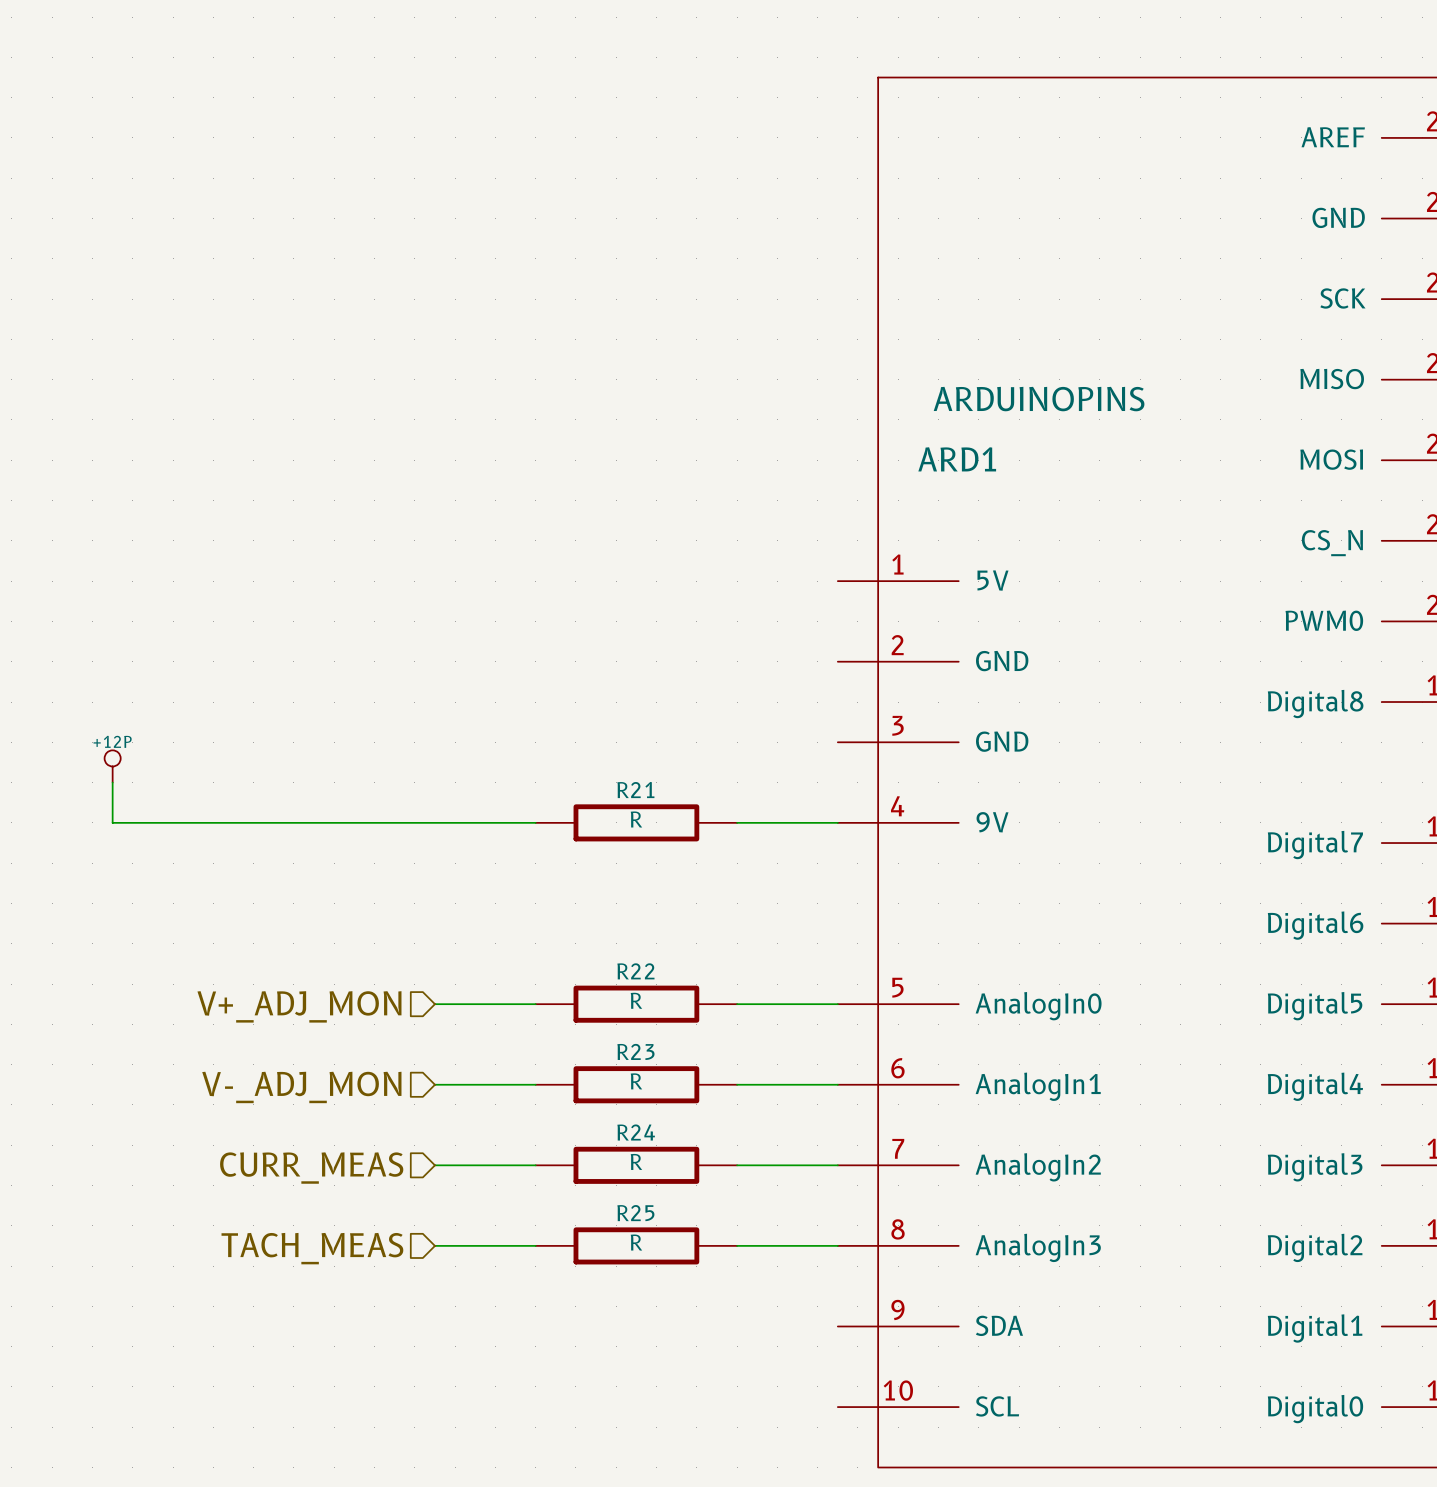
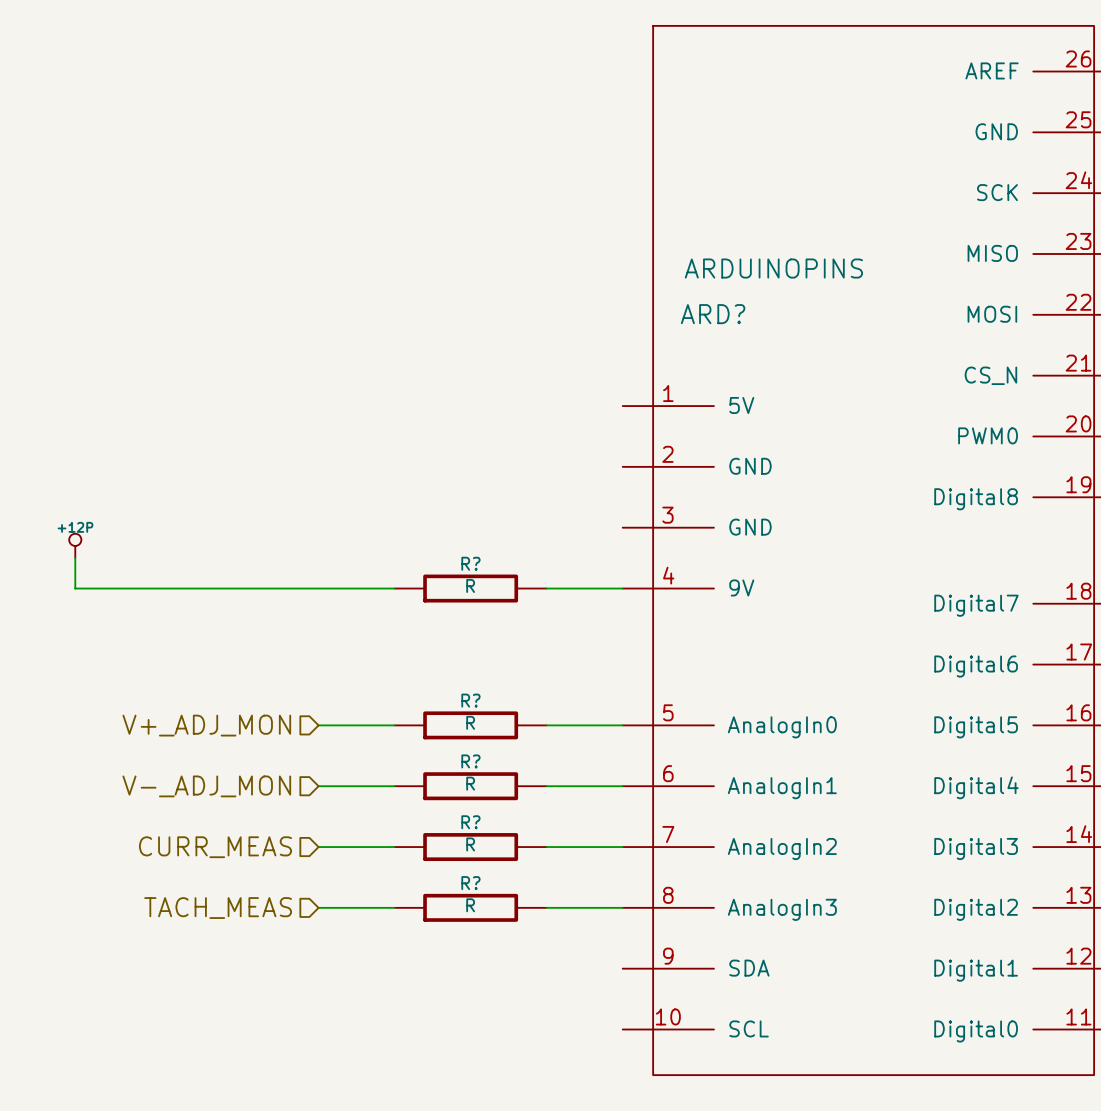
ARD1 name: ARD1 (957, 459) -> ARD? (713, 314)
R21 name: R21 (635, 790) -> R? (470, 563)
R22 name: R22 (635, 971) -> R? (470, 700)
R23 name: R23 (635, 1051) -> R? (470, 761)
R24 name: R24 (636, 1132) -> R? (470, 822)
R25 name: R25 (635, 1213) -> R? (470, 883)

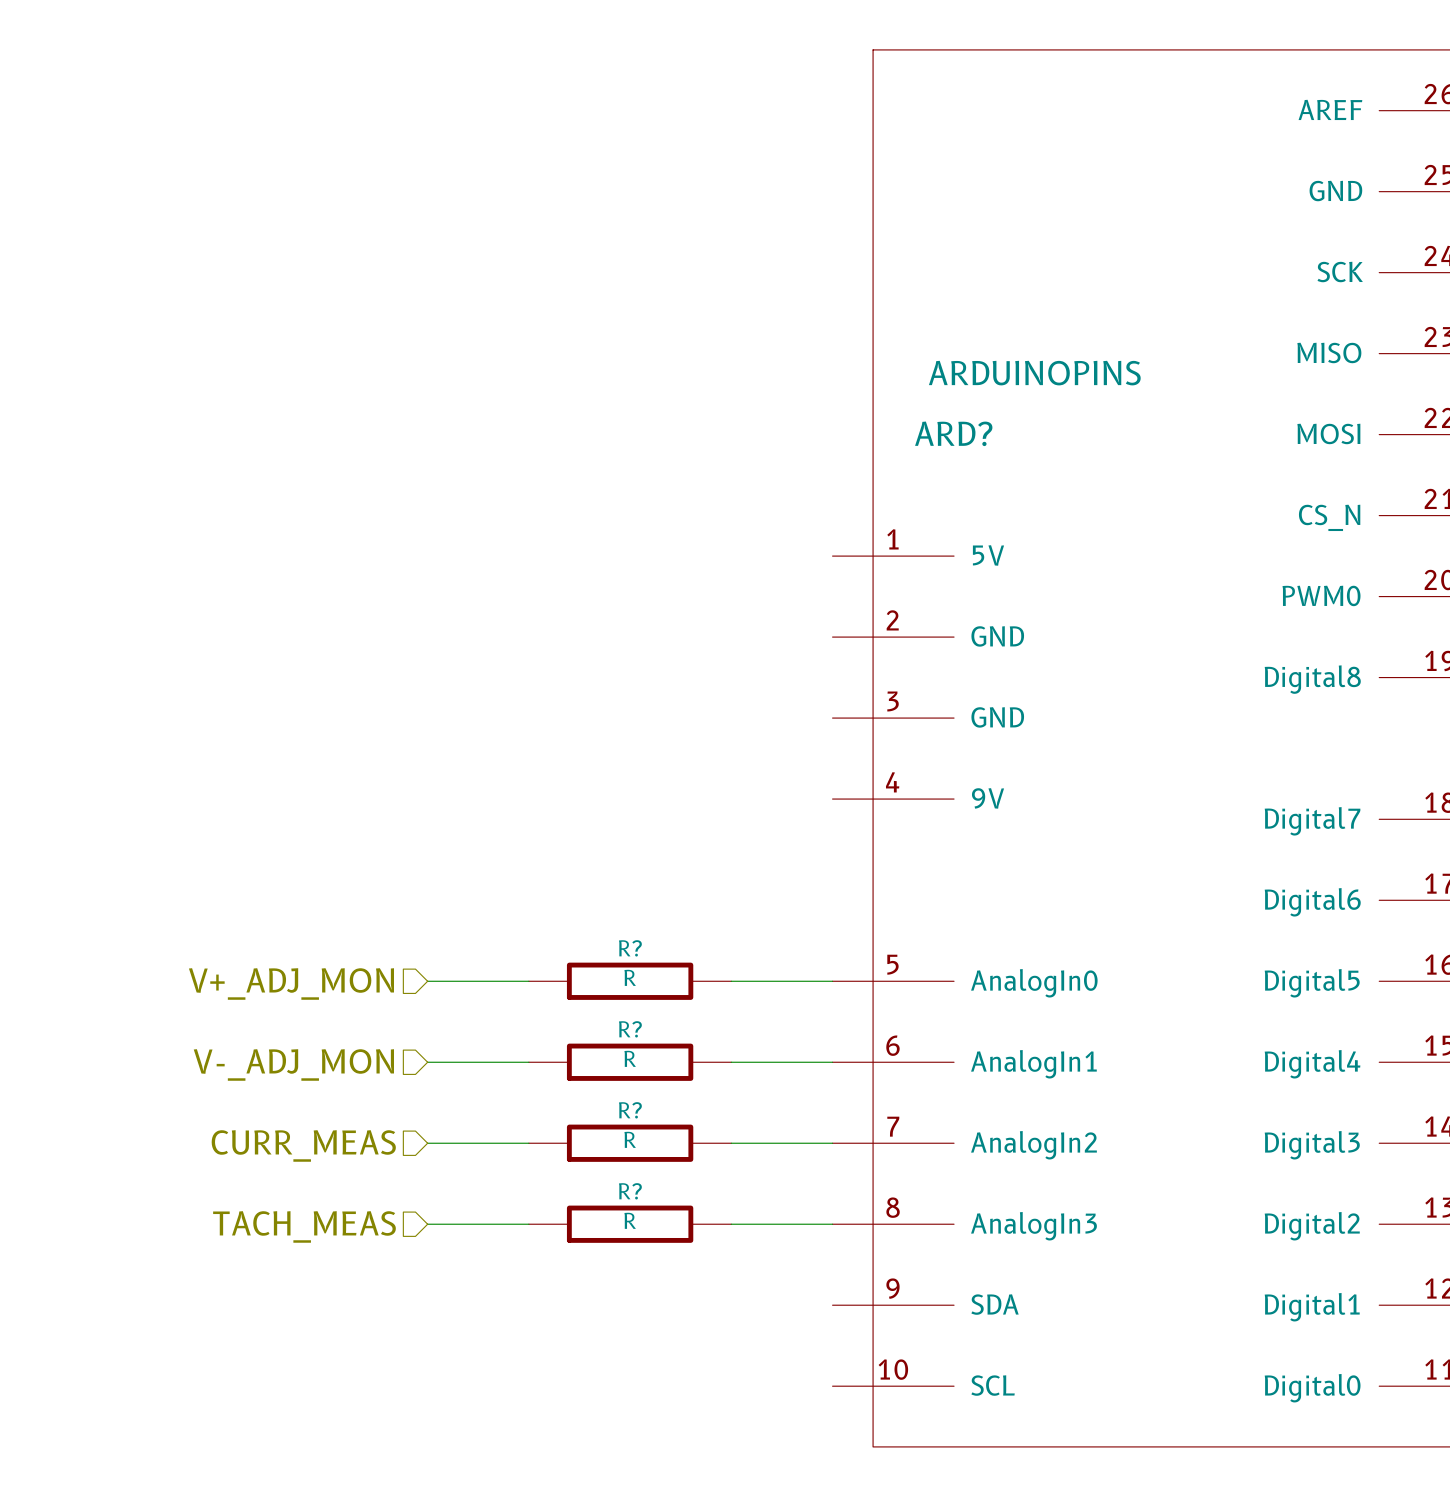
power symbol: +12P (75, 545) -> none
wire: (75, 558) (75, 588) (394, 588) -> none
R?: R (470, 588) -> none
wire: (546, 588) (622, 588) -> none

